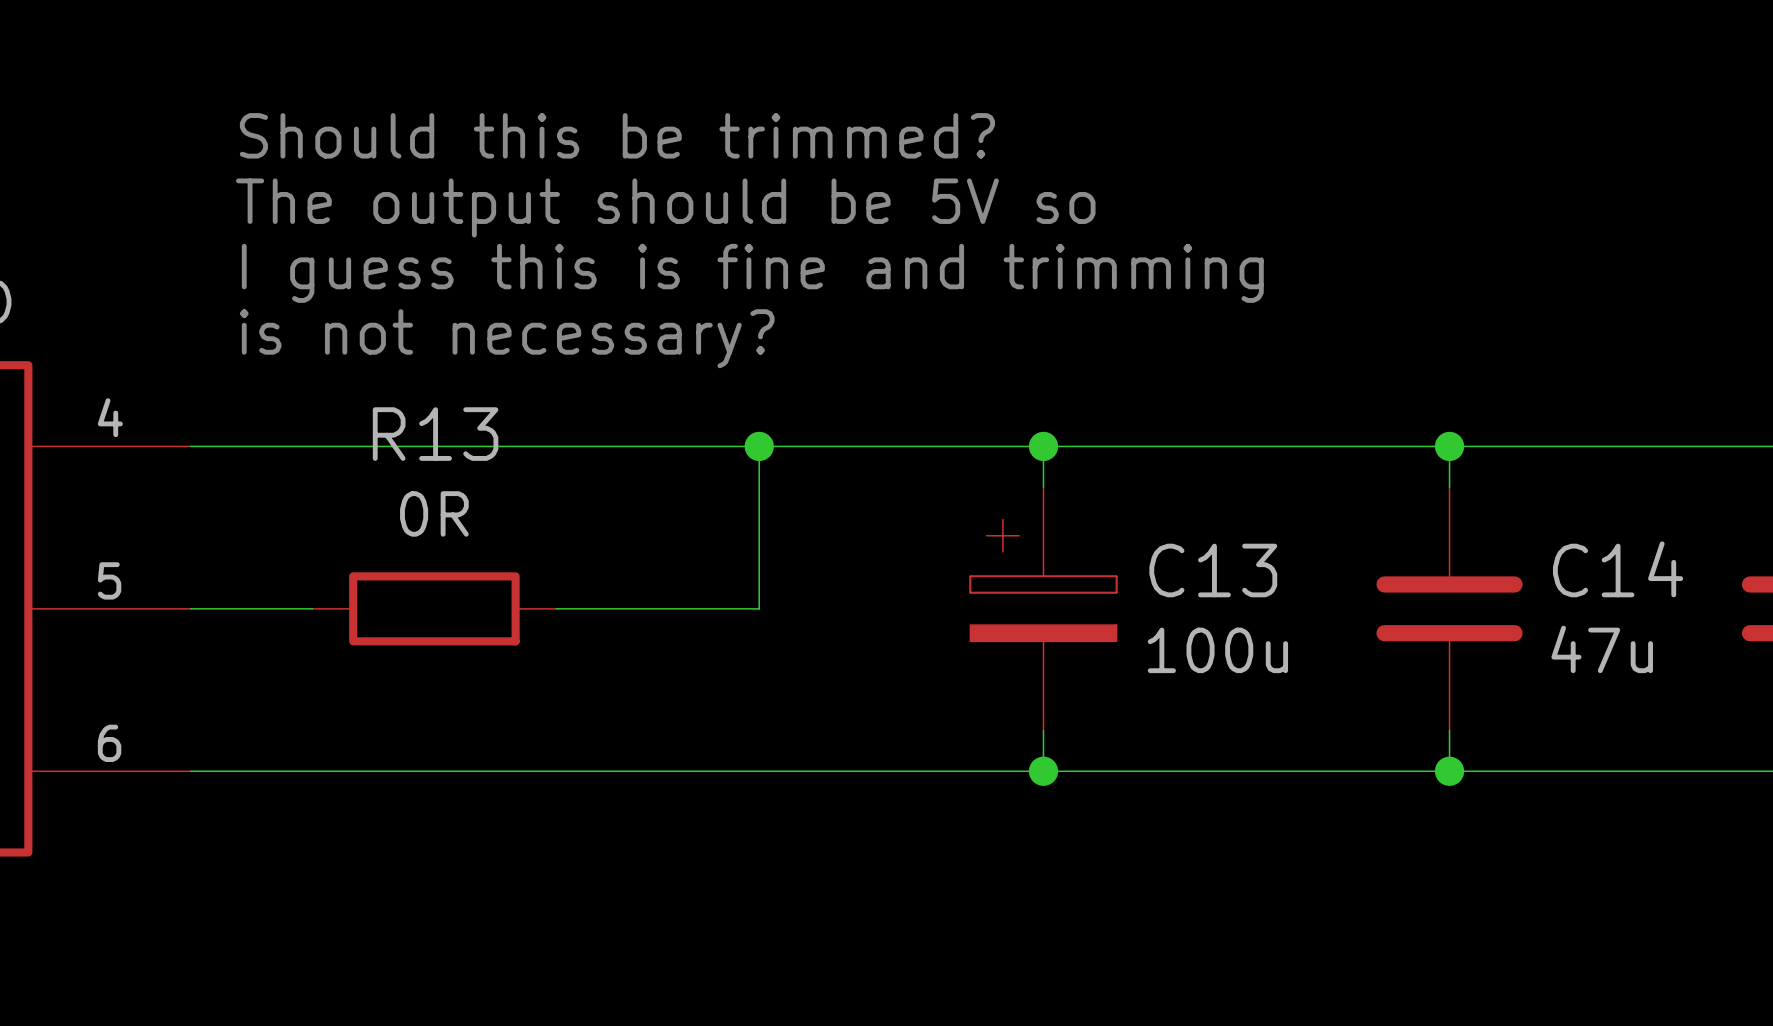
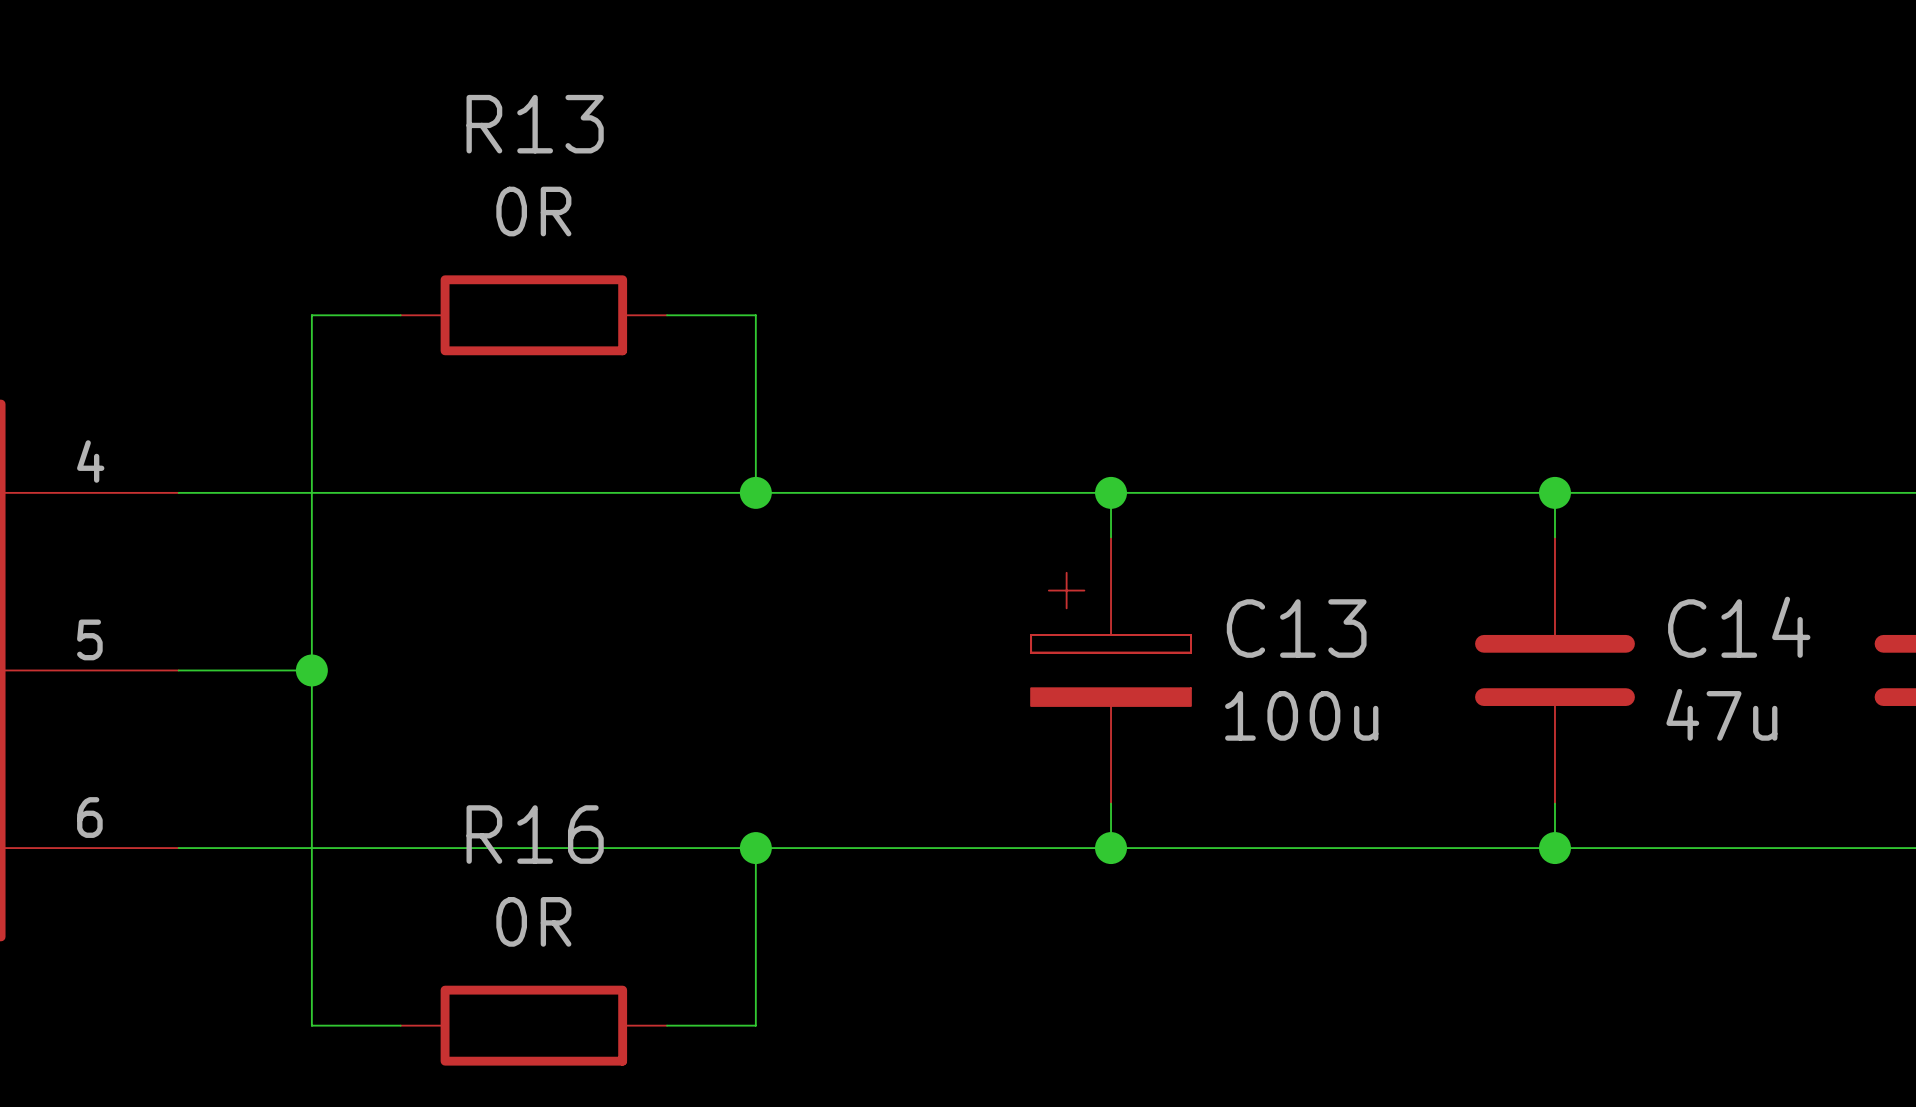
text: Should this be trimmed? (617, 135) -> none
text: The output should be 5V so (665, 207) -> none
text: I guess this is fine and trimming (752, 273) -> none
wire: none -> (400, 315) (311, 315) (311, 1025) (400, 1025)
wire: none -> (667, 315) (755, 315) (755, 492)
text: is not necessary? (507, 338) -> none
wire: (759, 446) (759, 608) (556, 608) -> none
junction position: (759, 446) -> (755, 492)
junction: none -> (311, 670)
R13 position: (434, 608) -> (533, 315)
wire: none -> (755, 848) (755, 1025) (667, 1025)
junction: none -> (755, 848)
R16: none -> (533, 1025)

